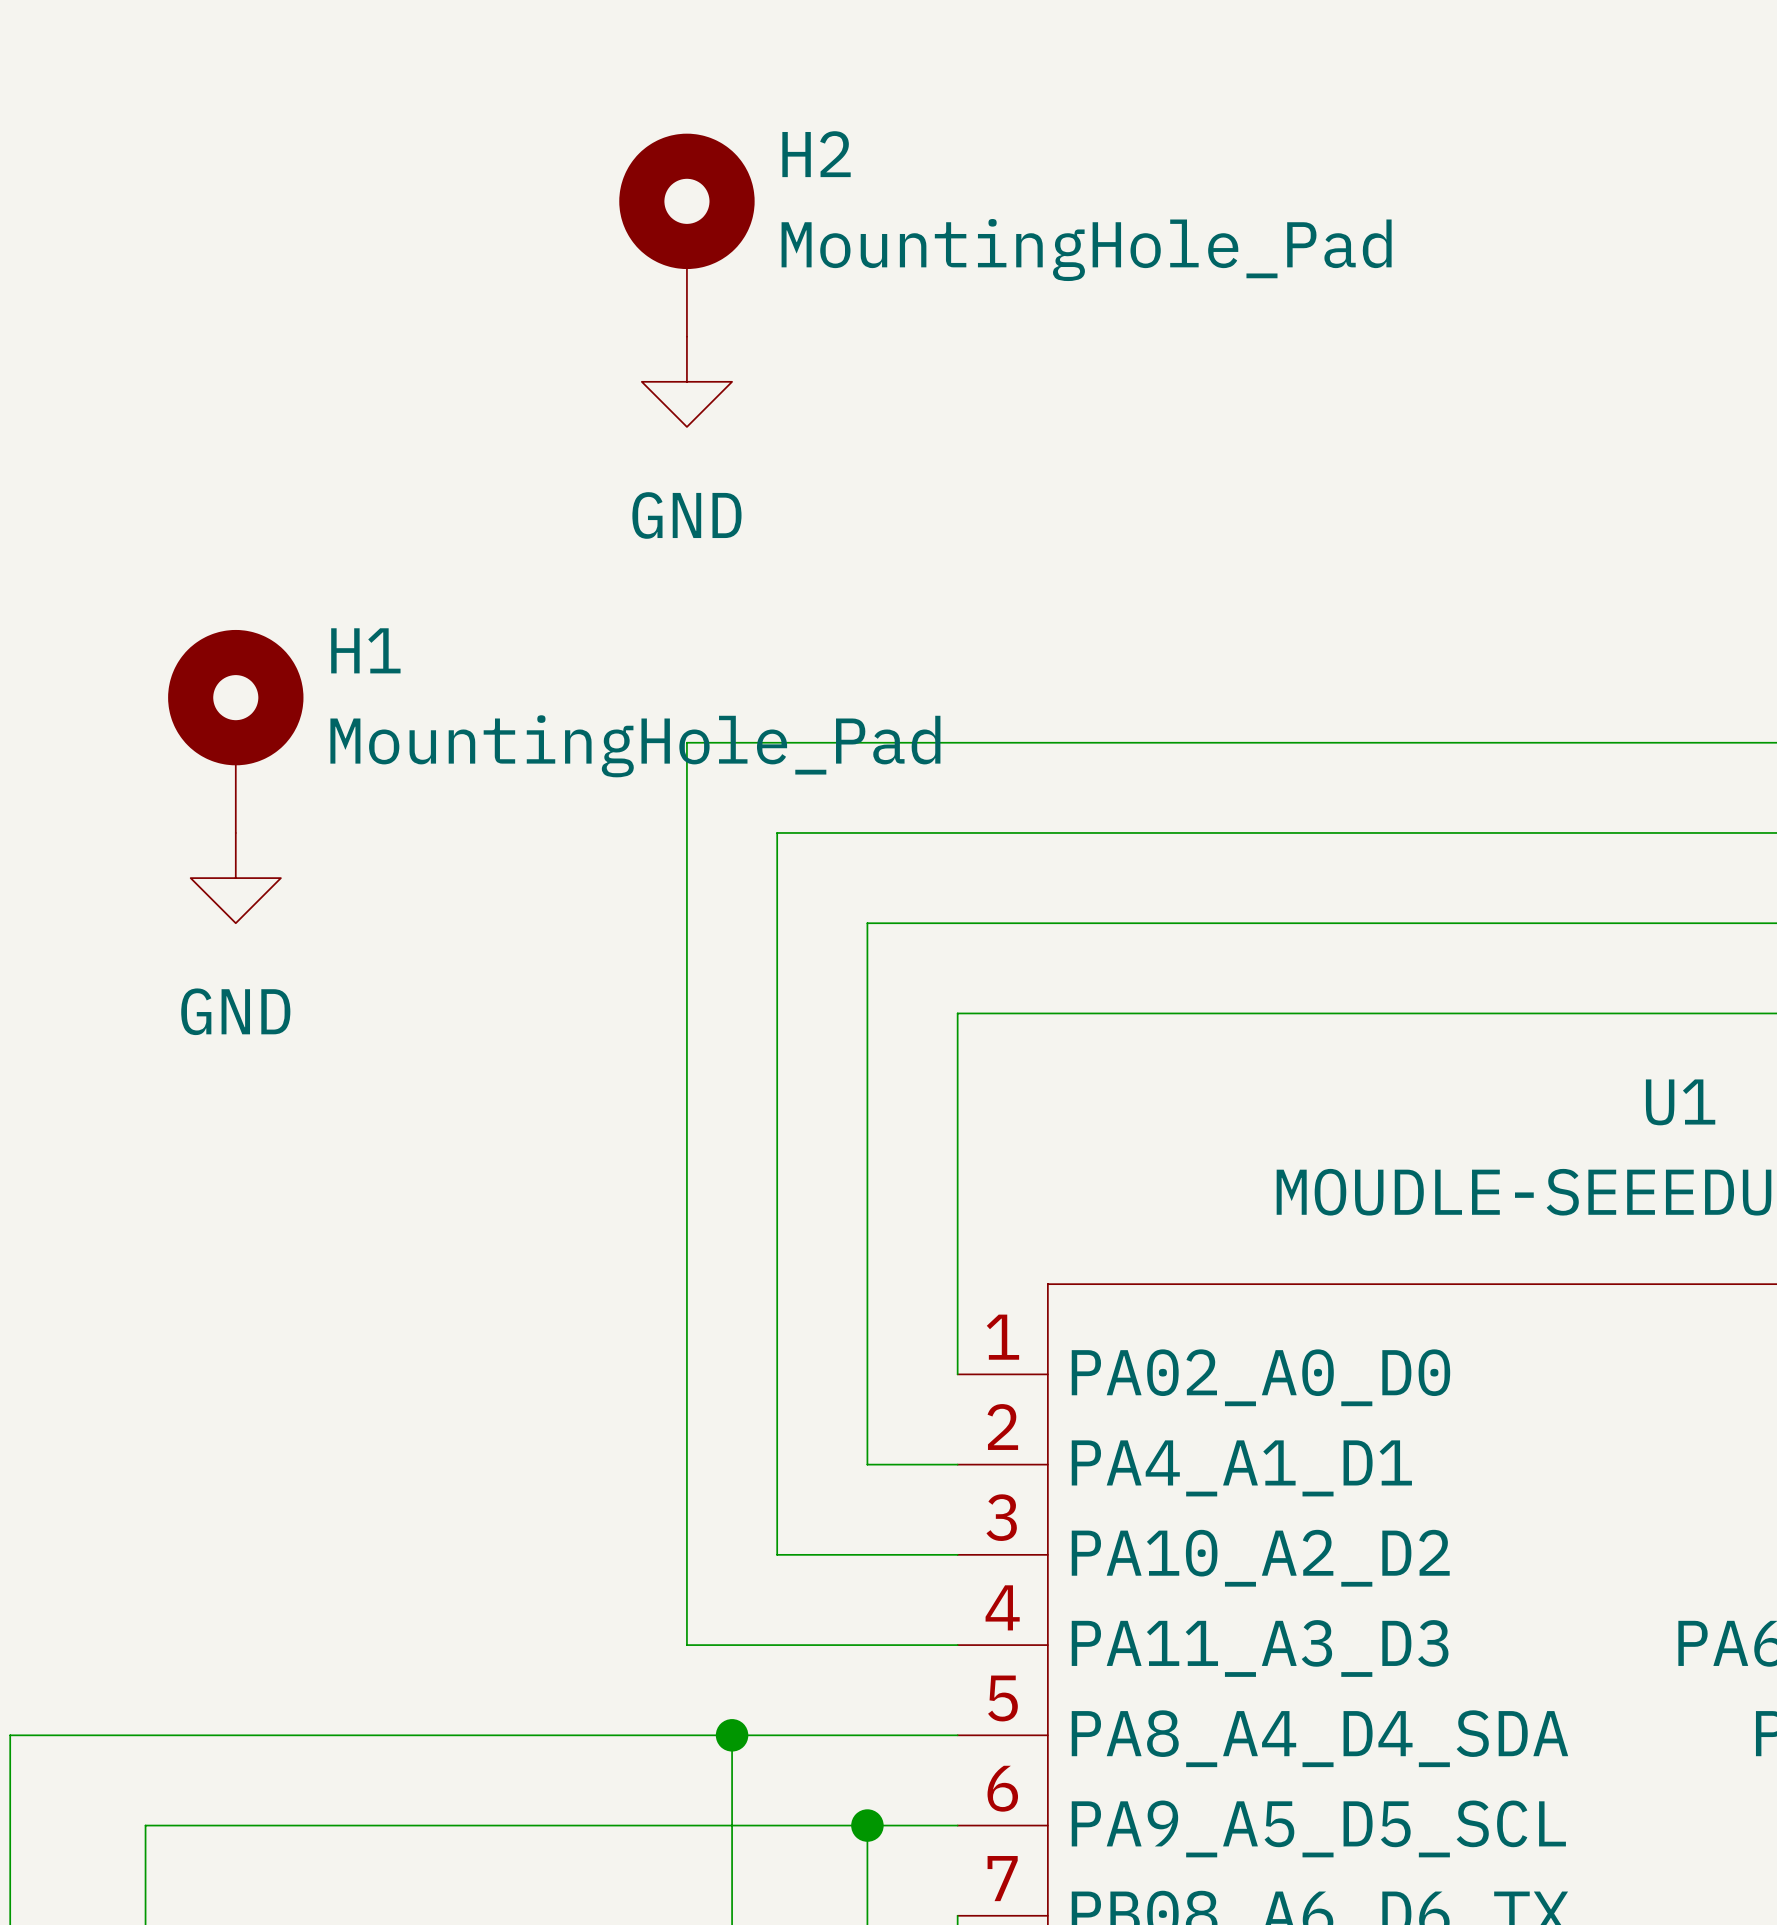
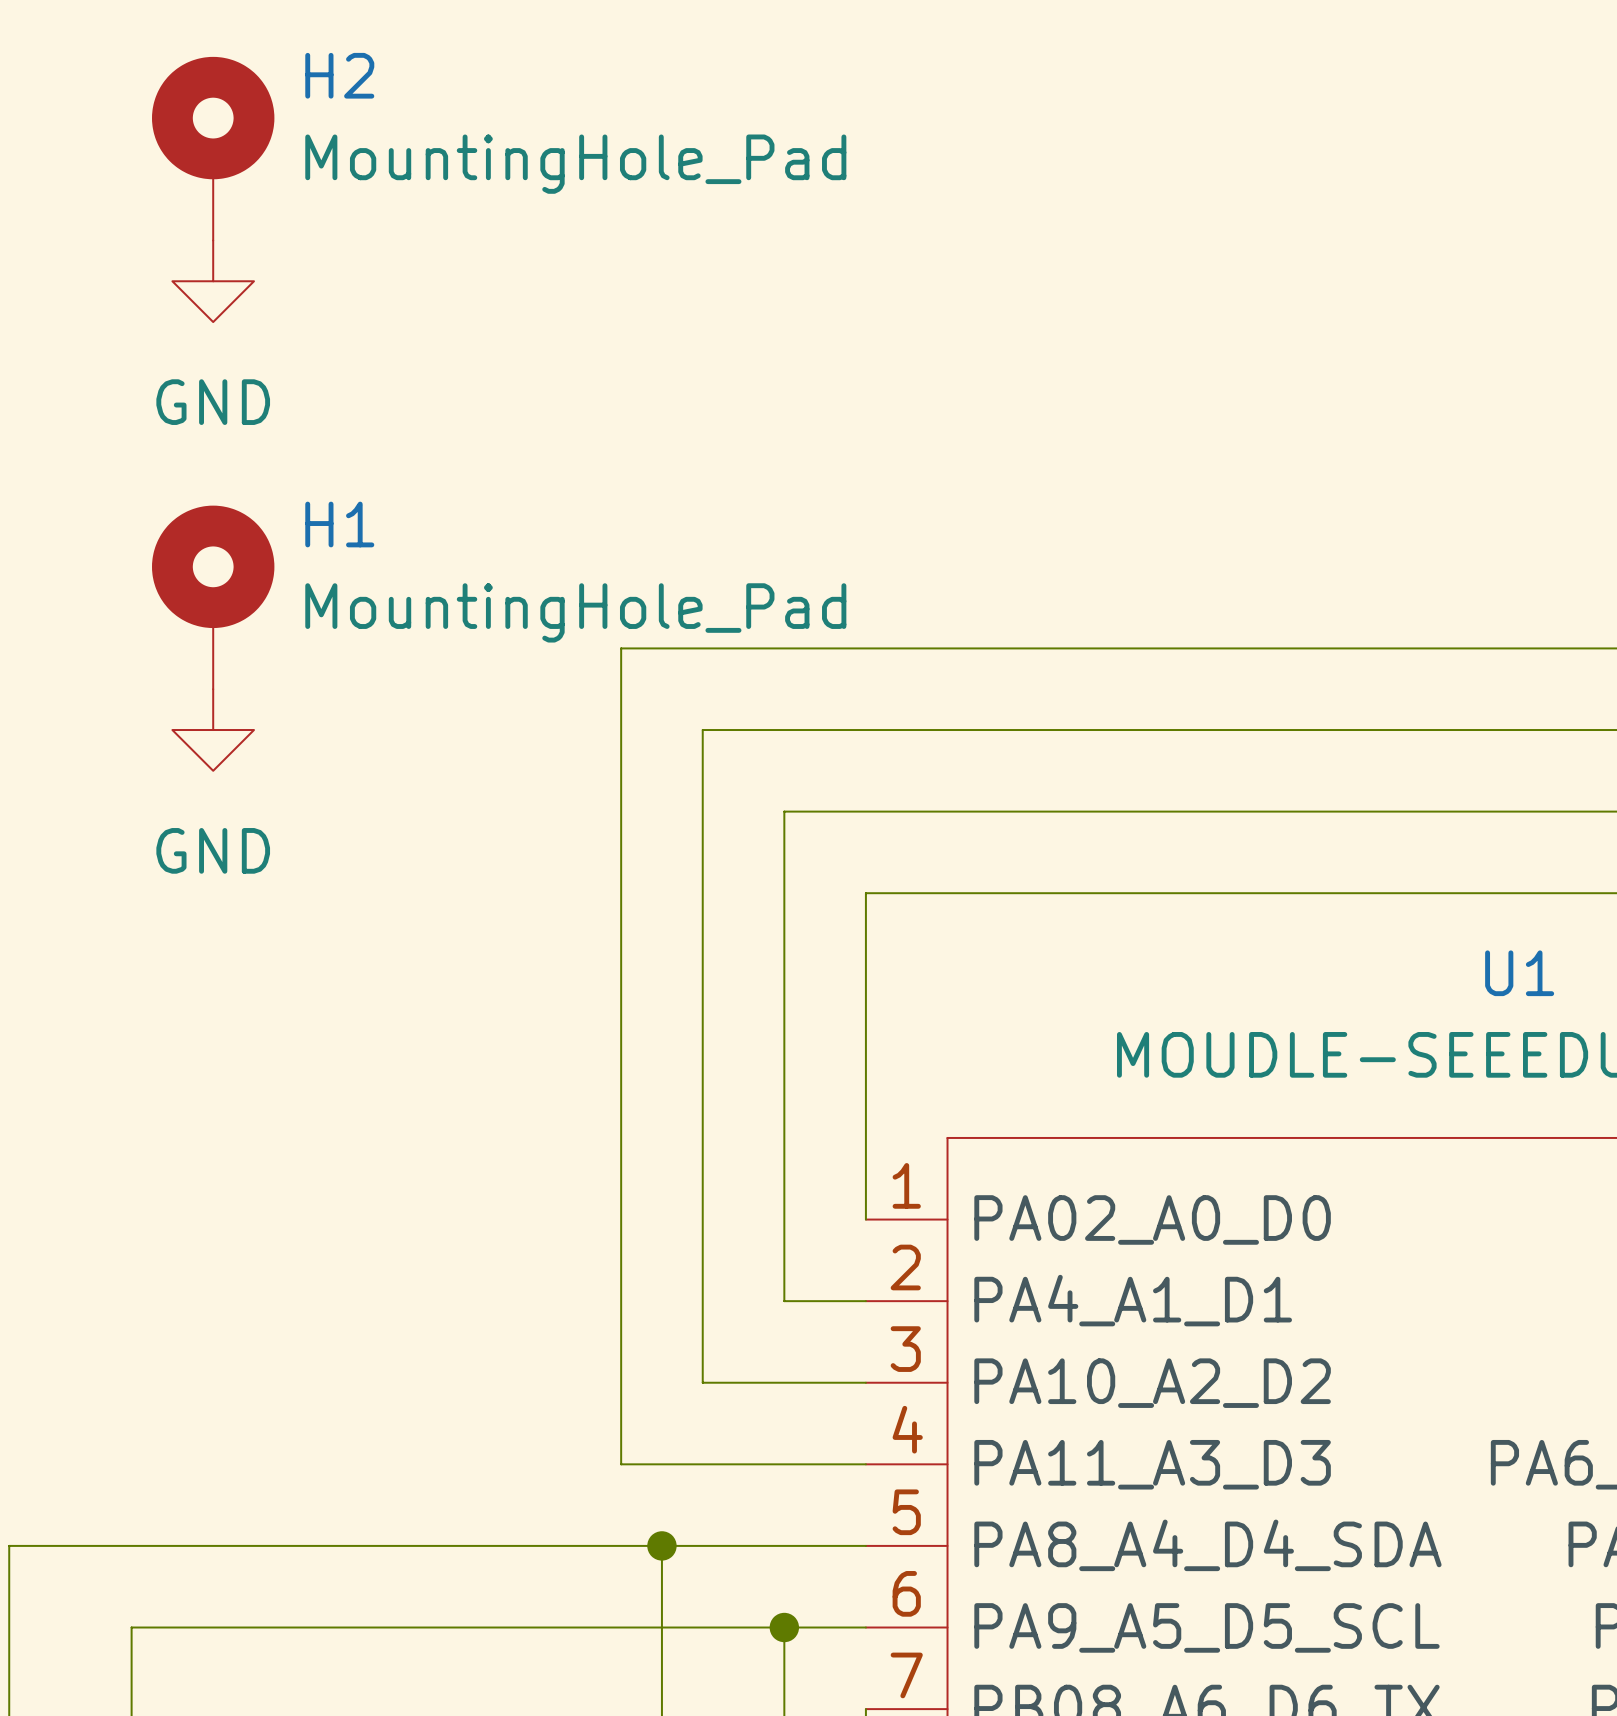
H2 position: (686, 235) -> (213, 148)
power symbol: none -> GND (213, 281)
power symbol: GND (686, 381) -> none
H1 position: (235, 731) -> (213, 597)
power symbol position: GND (235, 878) -> GND (213, 730)

